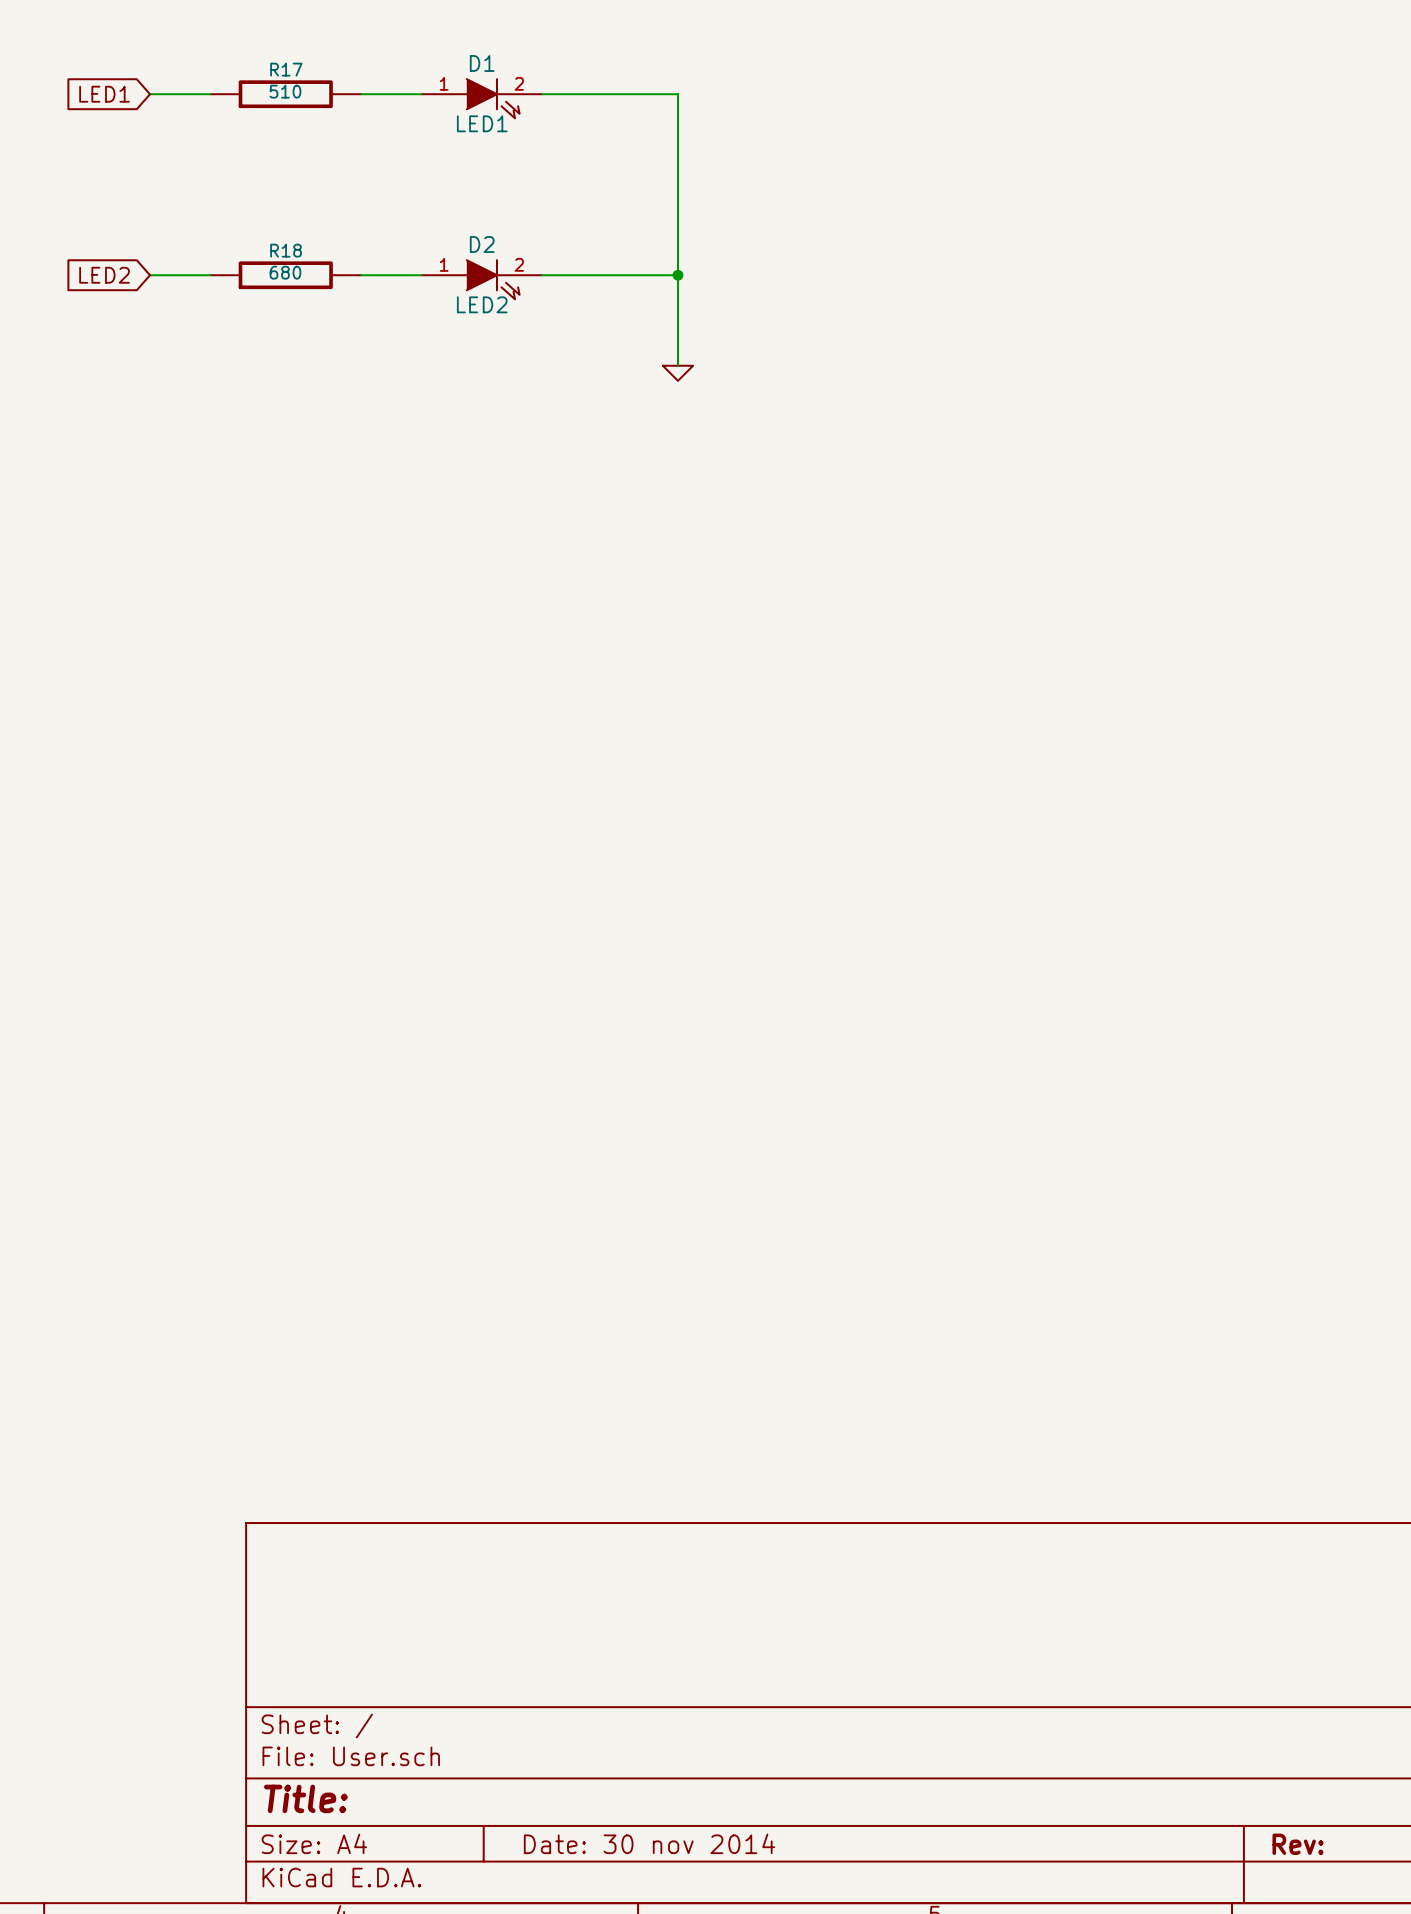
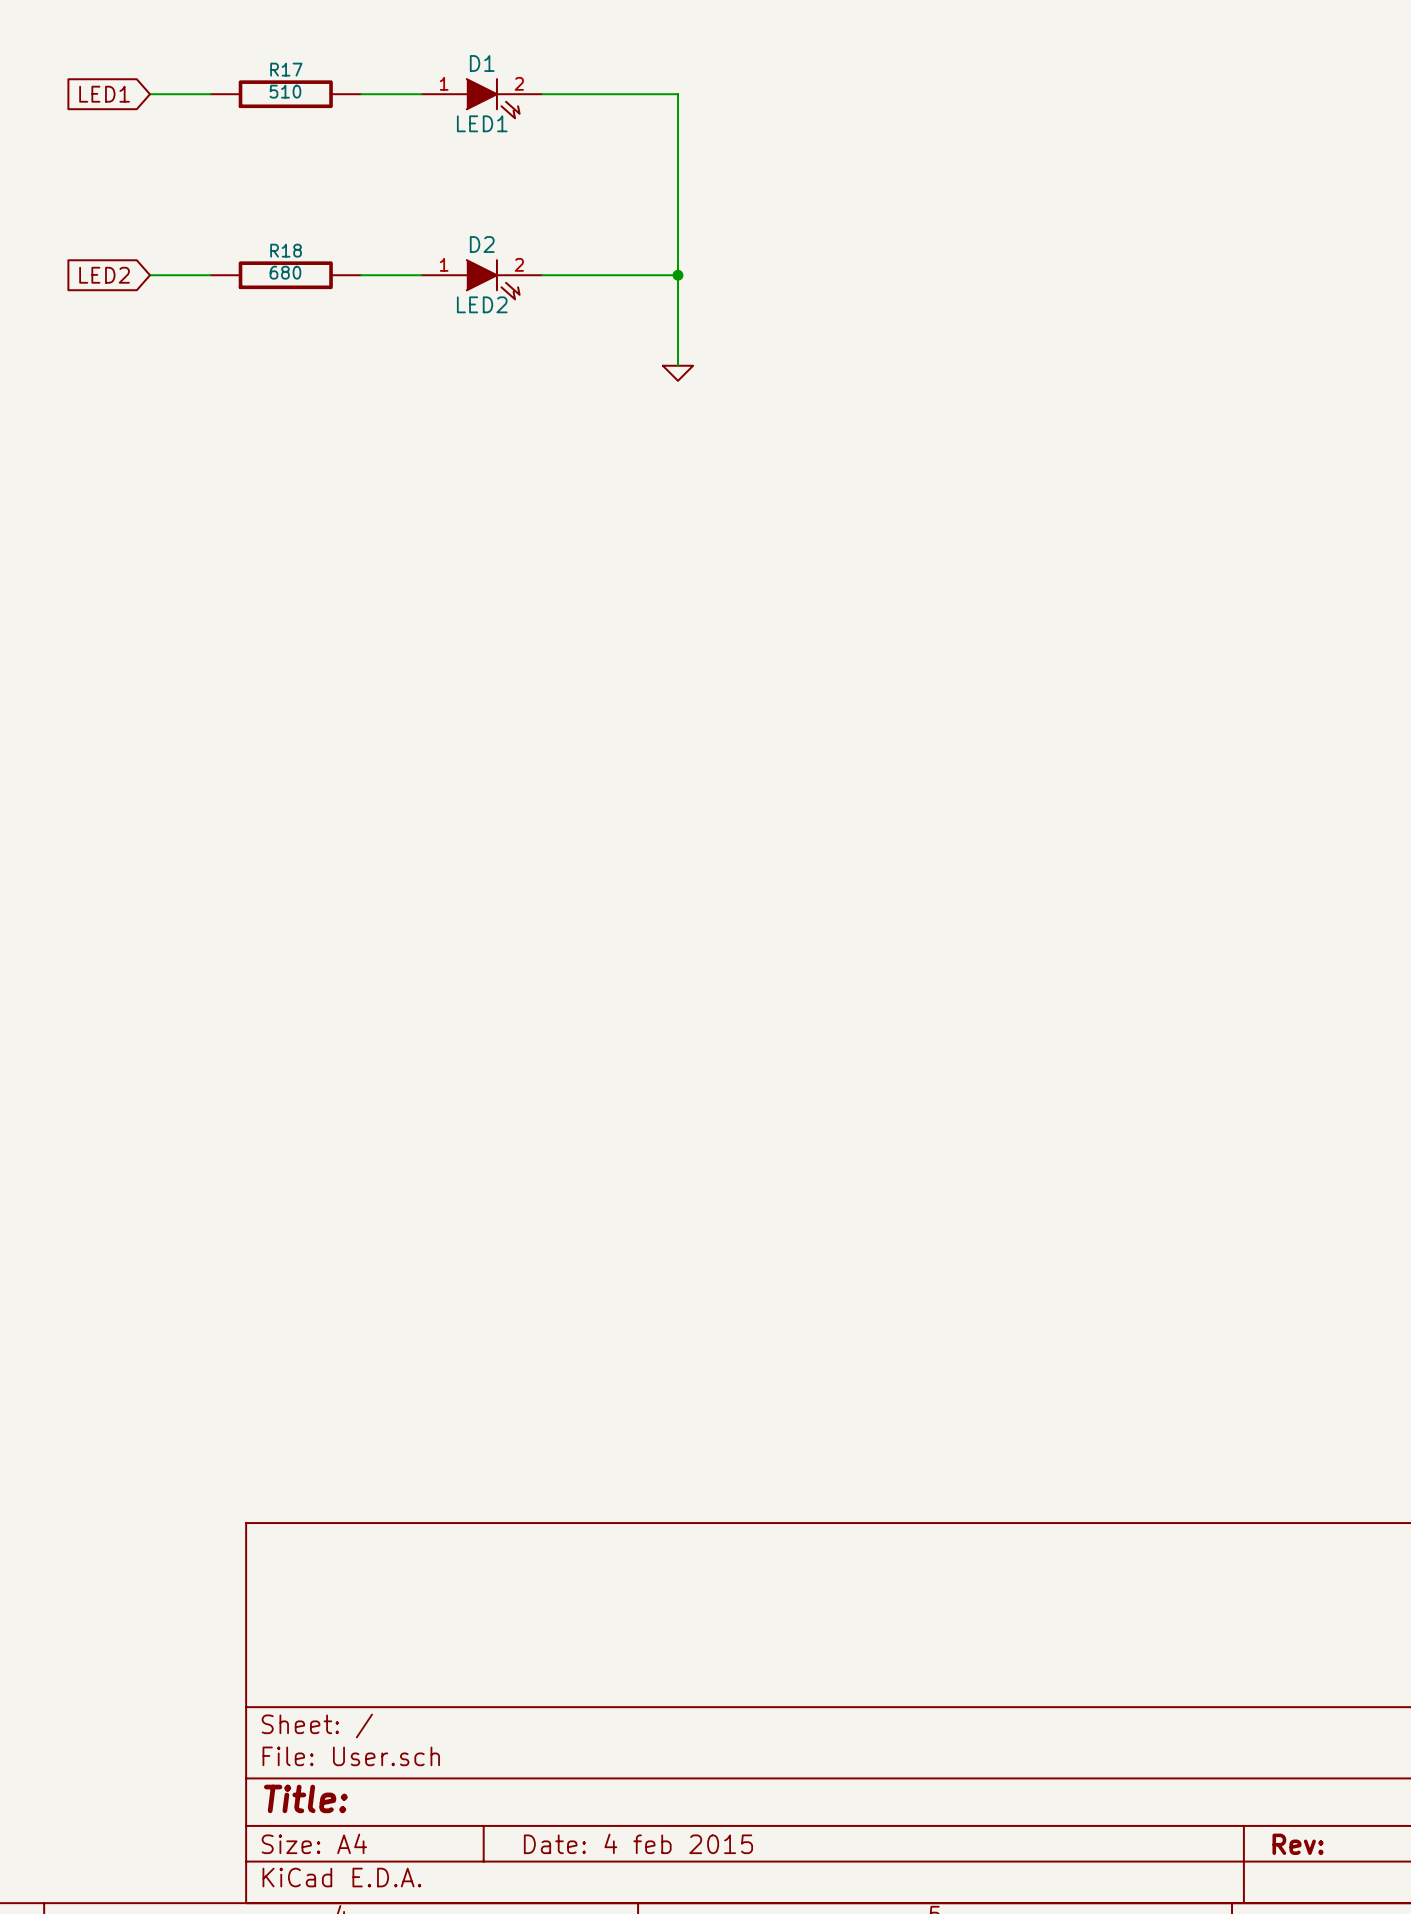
title block: Date: 30 nov 2014 (649, 1843) -> Date: 4 feb 2015 (638, 1843)

